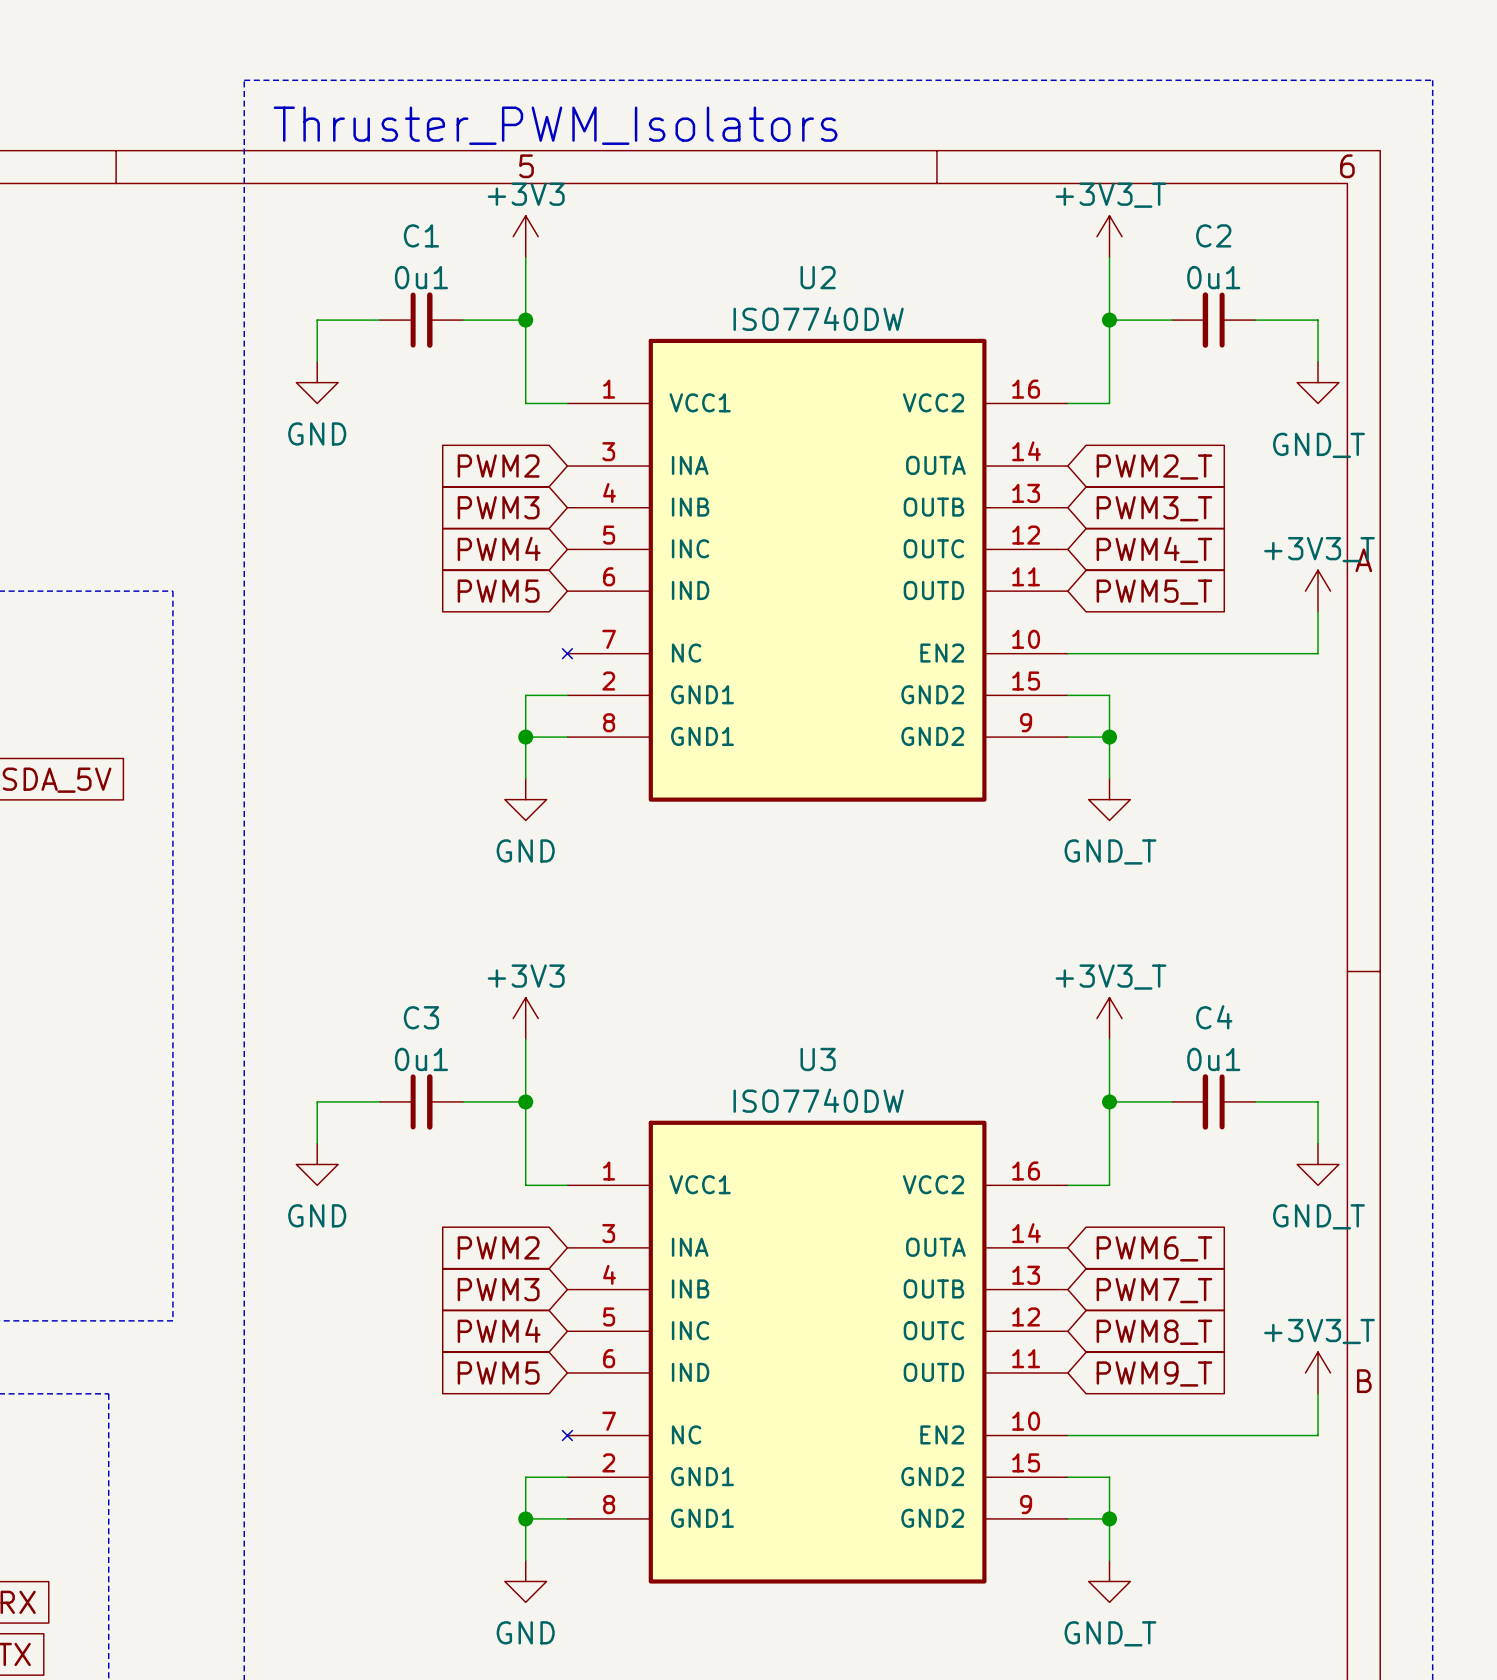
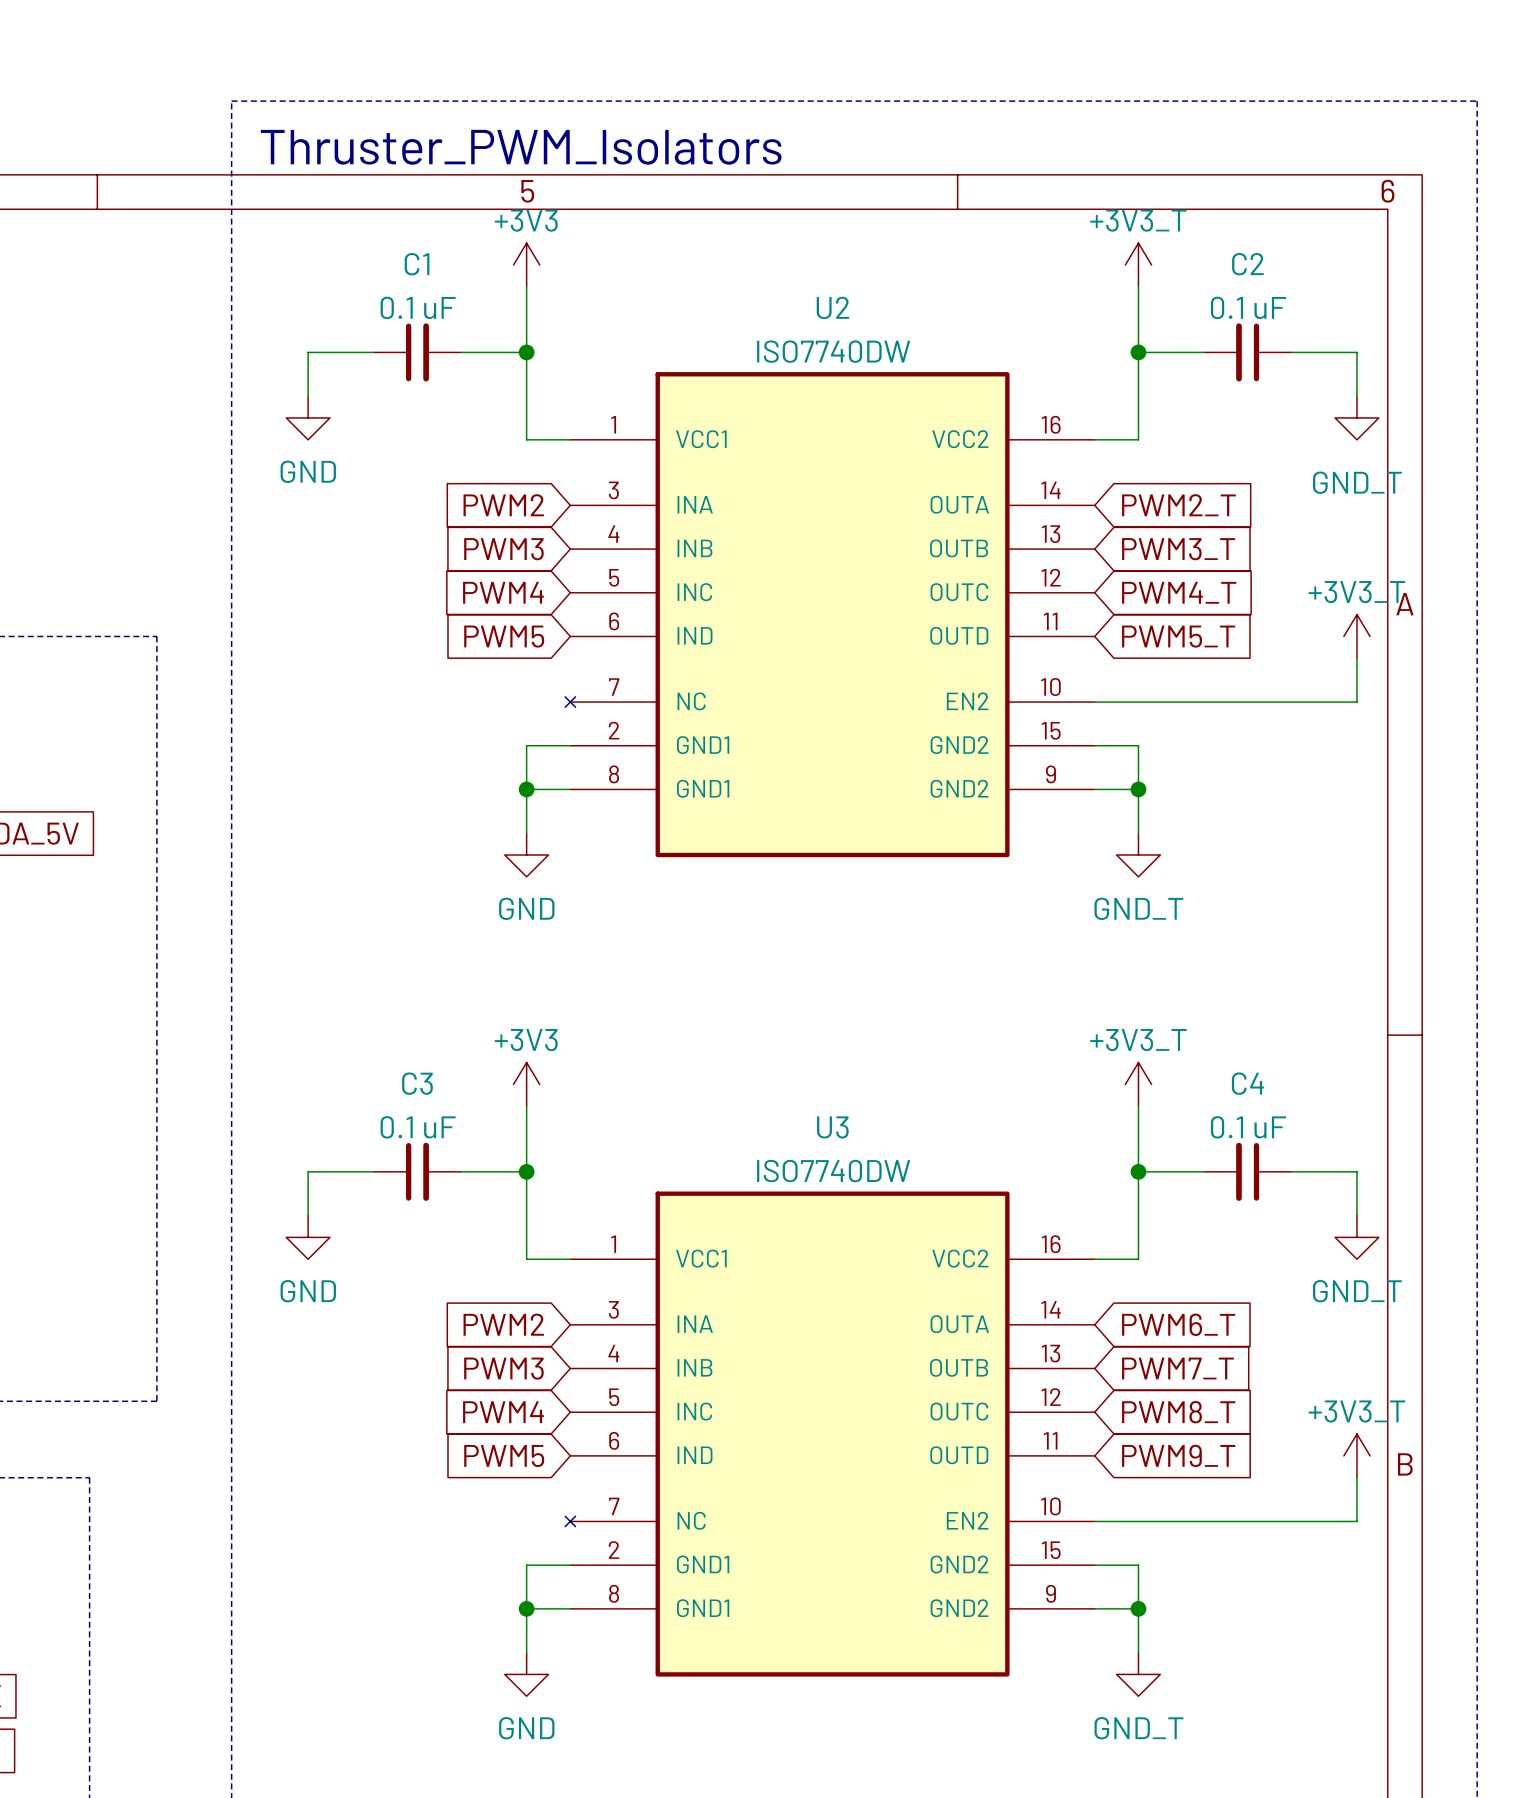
C1 value: 0u1 (421, 277) -> 0.1 uF (418, 307)
C2 value: 0u1 (1213, 277) -> 0.1 uF (1248, 307)
C3 value: 0u1 (421, 1059) -> 0.1 uF (418, 1127)
C4 value: 0u1 (1213, 1059) -> 0.1 uF (1248, 1127)

